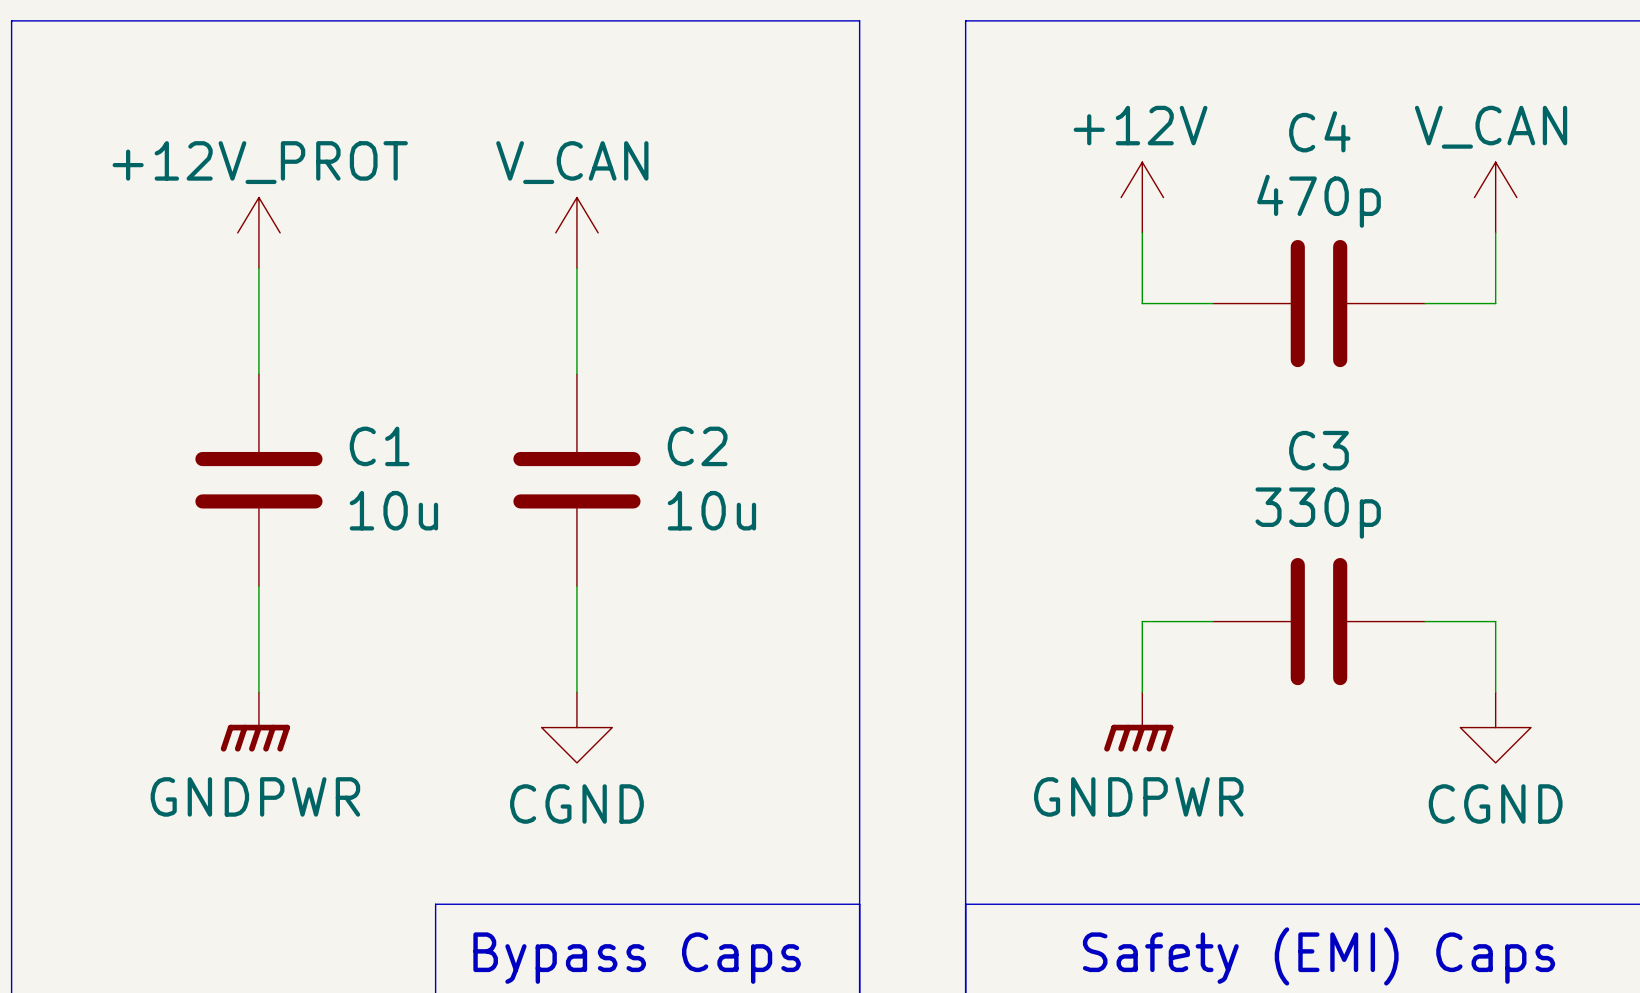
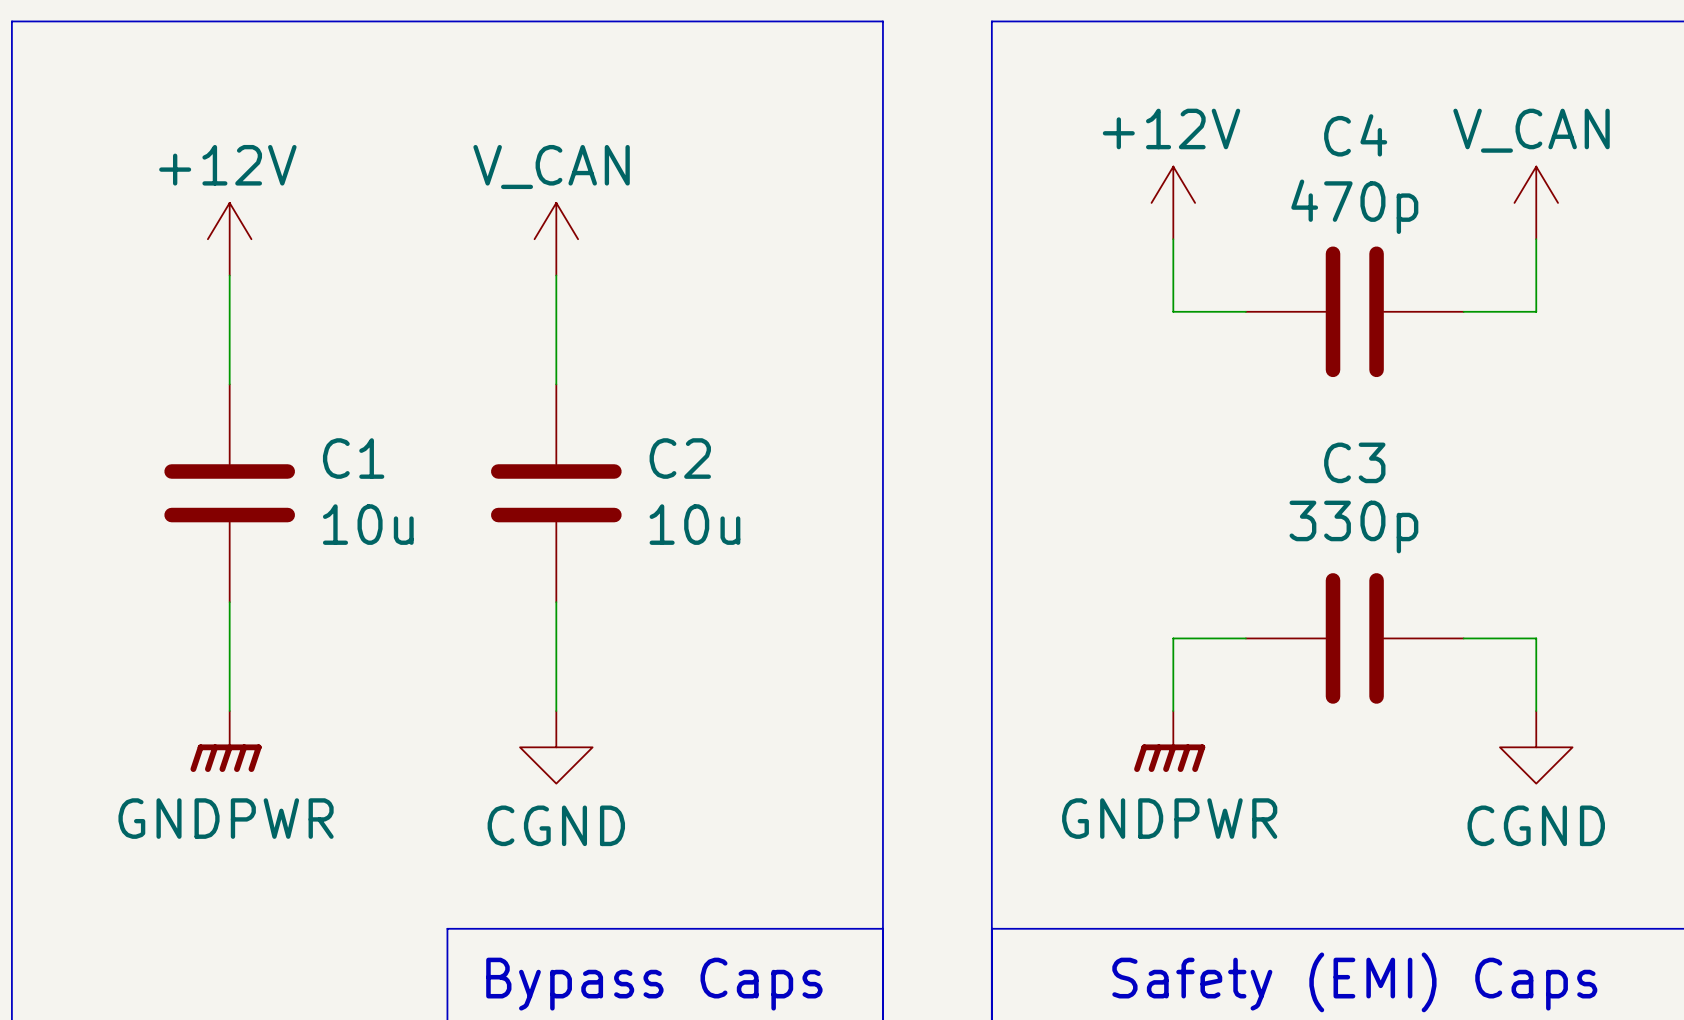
power symbol: none -> +12V (229, 239)
power symbol: +12V_PROT (258, 232) -> none
power symbol position: V_CAN (576, 232) -> V_CAN (556, 239)
wire: (258, 268) (258, 374) -> (229, 275) (229, 384)
wire: (576, 268) (576, 374) -> (556, 275) (556, 384)
C1 position: (258, 480) -> (229, 493)
C2 position: (576, 480) -> (556, 493)
wire: (258, 586) (258, 692) -> (229, 602) (229, 711)
wire: (576, 586) (576, 692) -> (556, 602) (556, 711)
power symbol position: GNDPWR (255, 721) -> GNDPWR (226, 741)
power symbol position: CGND (576, 727) -> CGND (556, 747)

